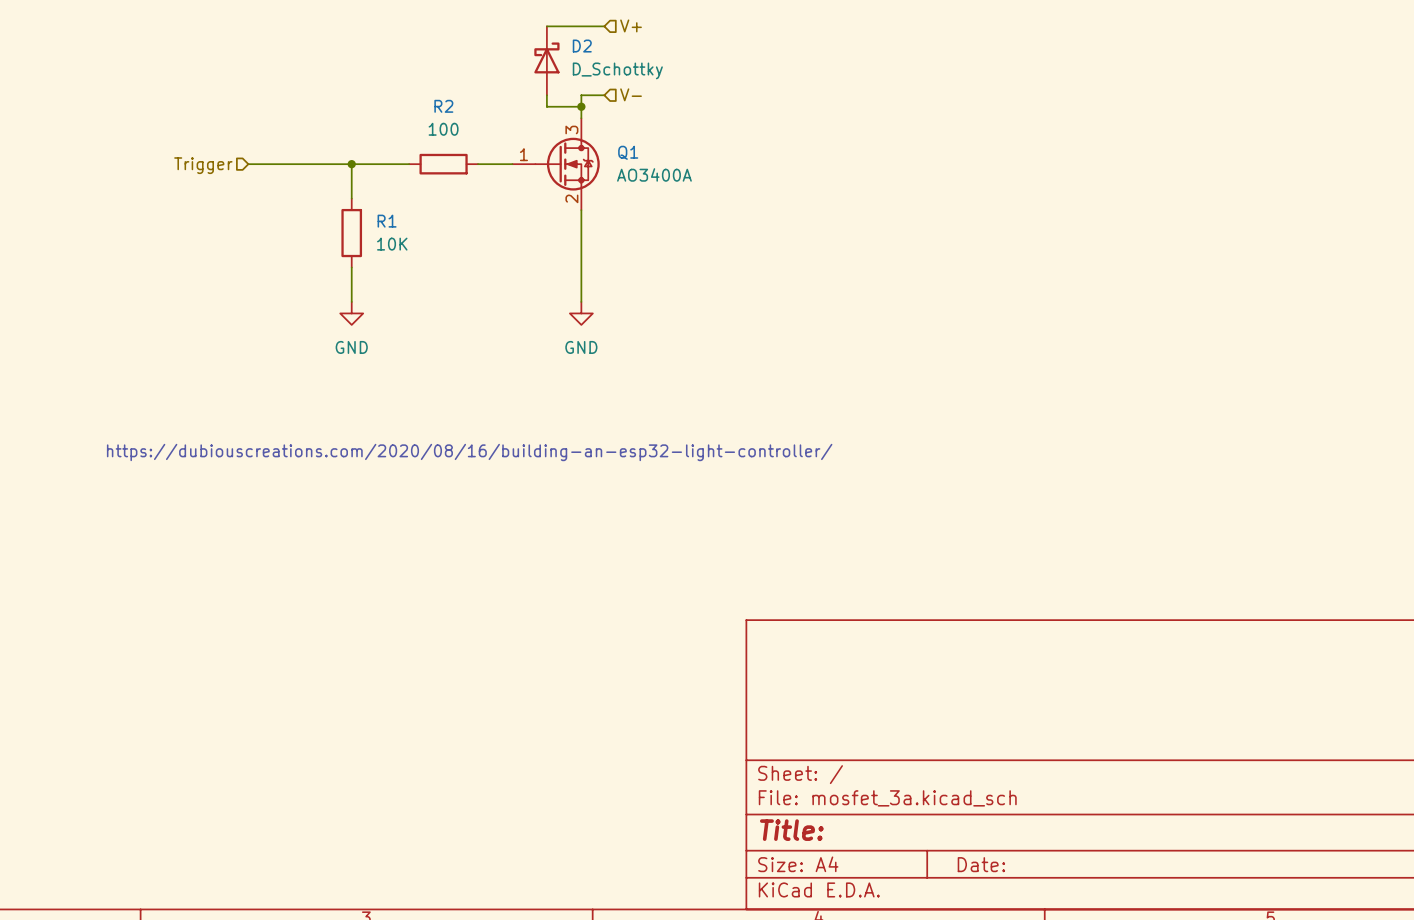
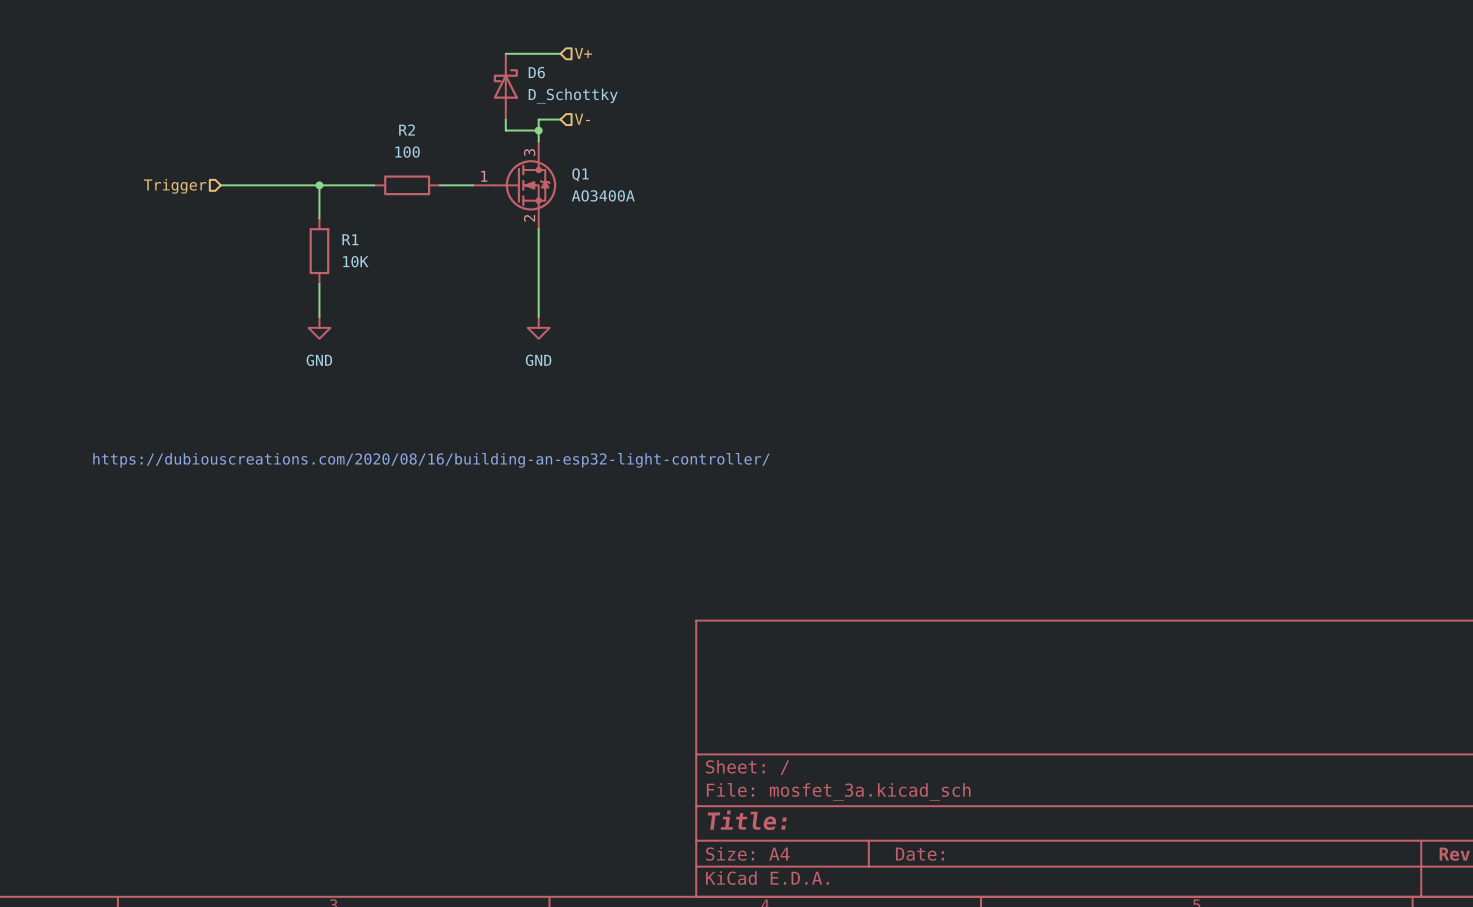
D2 name: D2 (582, 46) -> D6 (536, 72)

